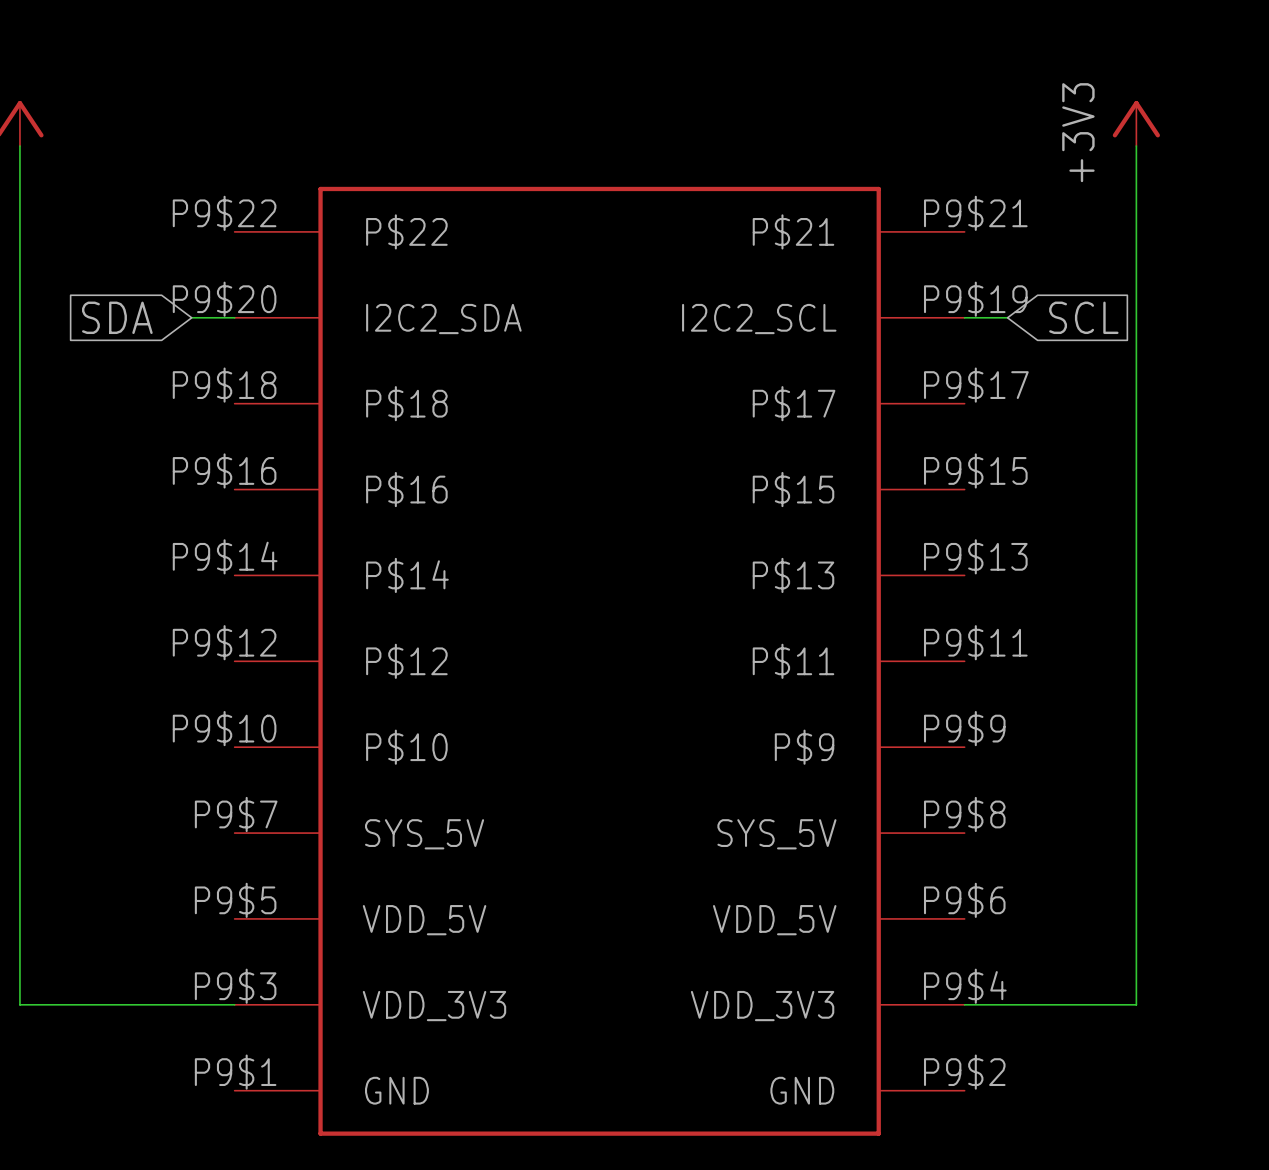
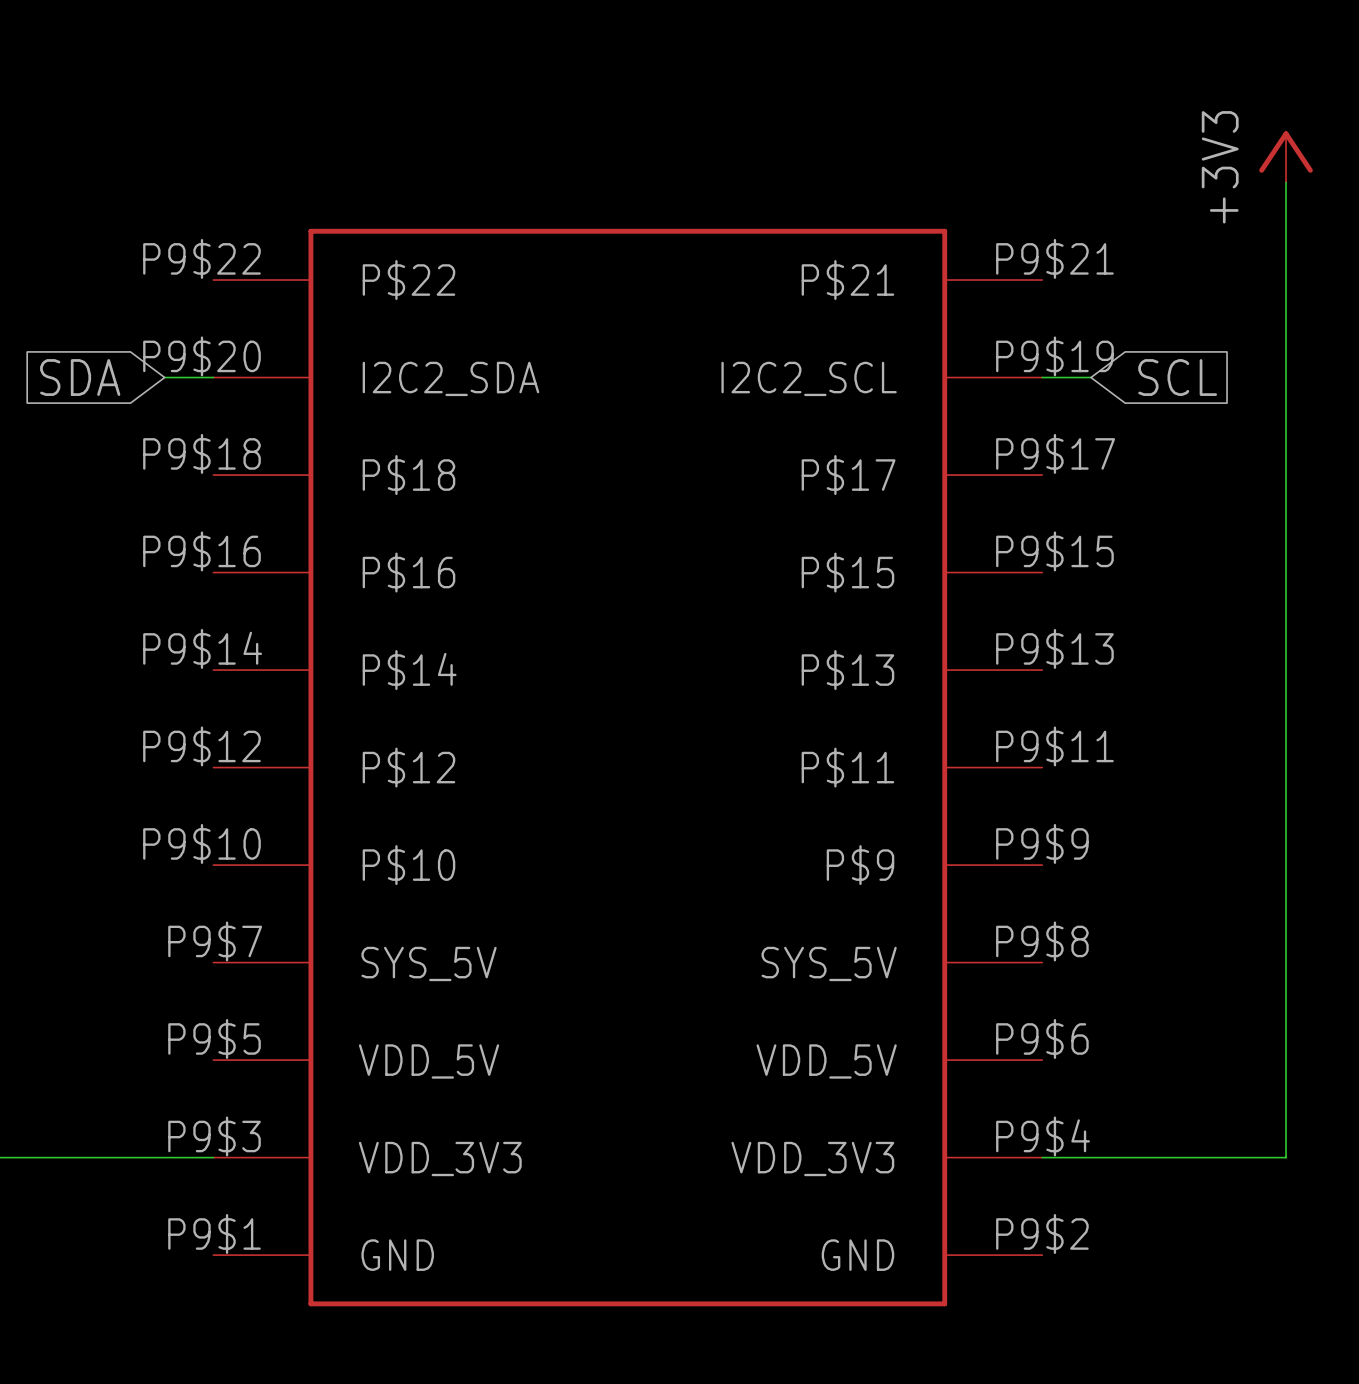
power symbol position: +3V3 (1136, 123) -> +3V3 (1286, 156)
wire: (1136, 146) (1136, 1004) -> (1286, 182) (1286, 1157) (1237, 1157)

